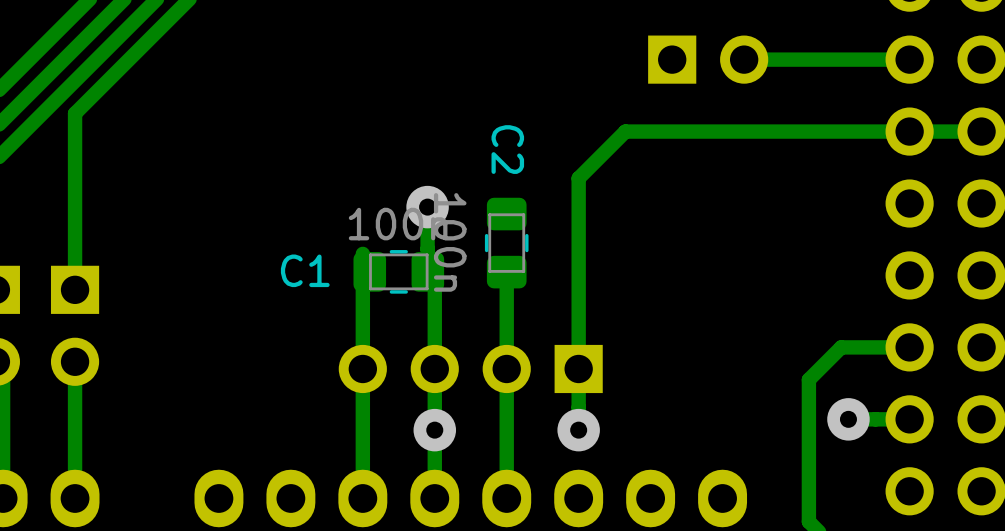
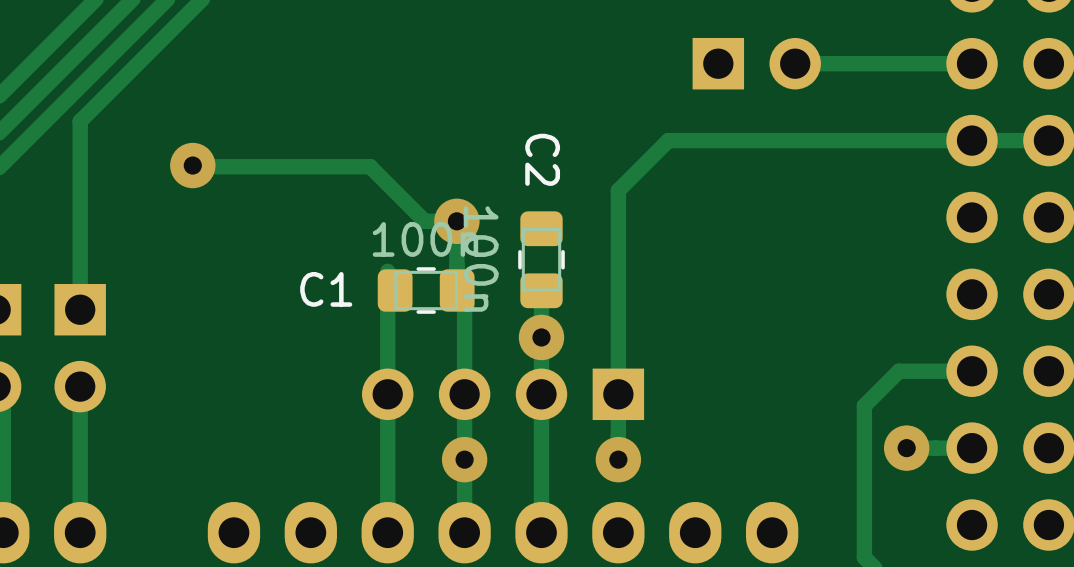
via: none -> (192, 165)
track: none -> (213, 166) (370, 166) (424, 221) (456, 221)
via: none -> (541, 337)

